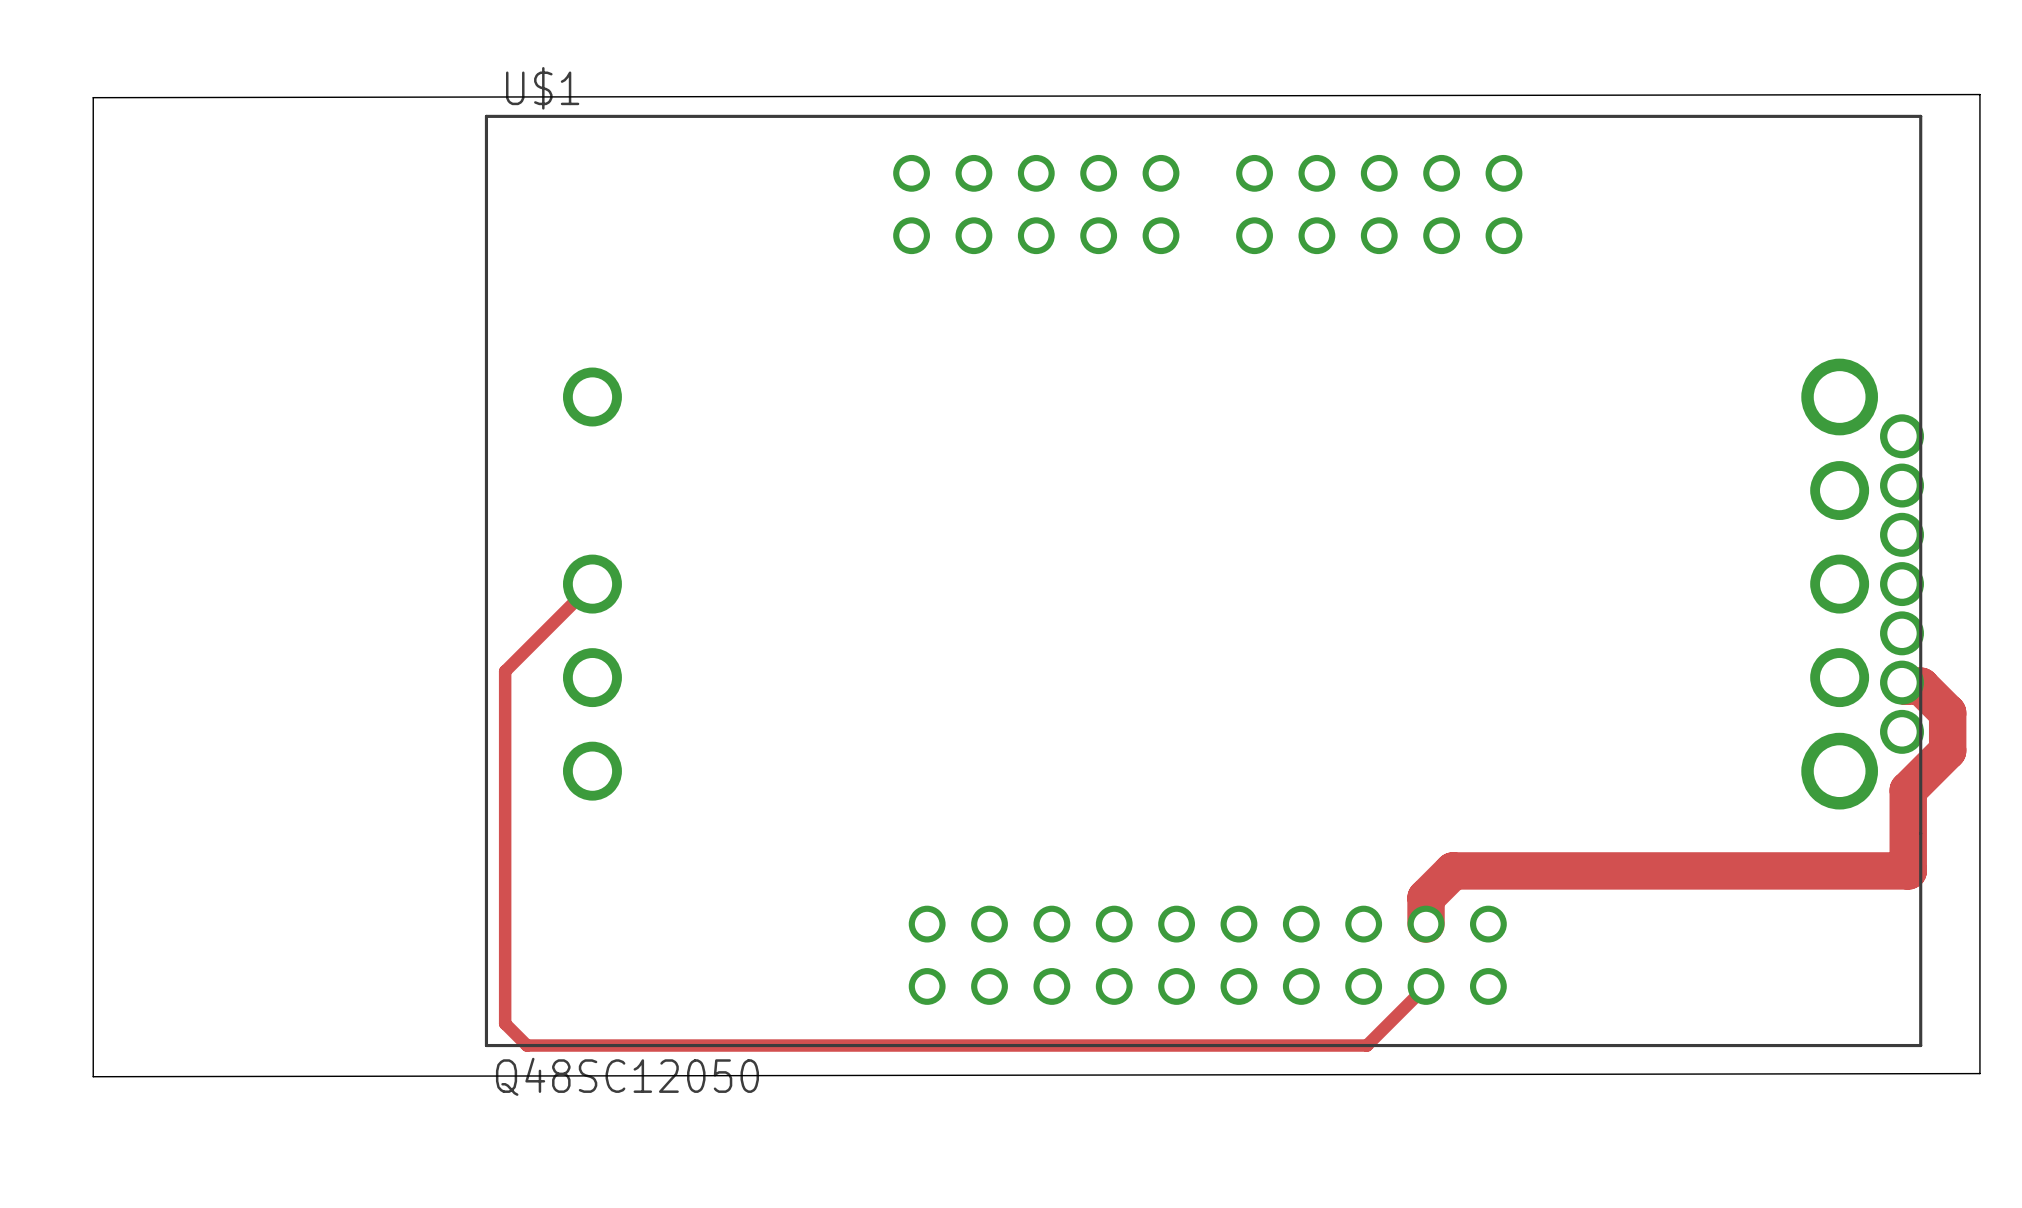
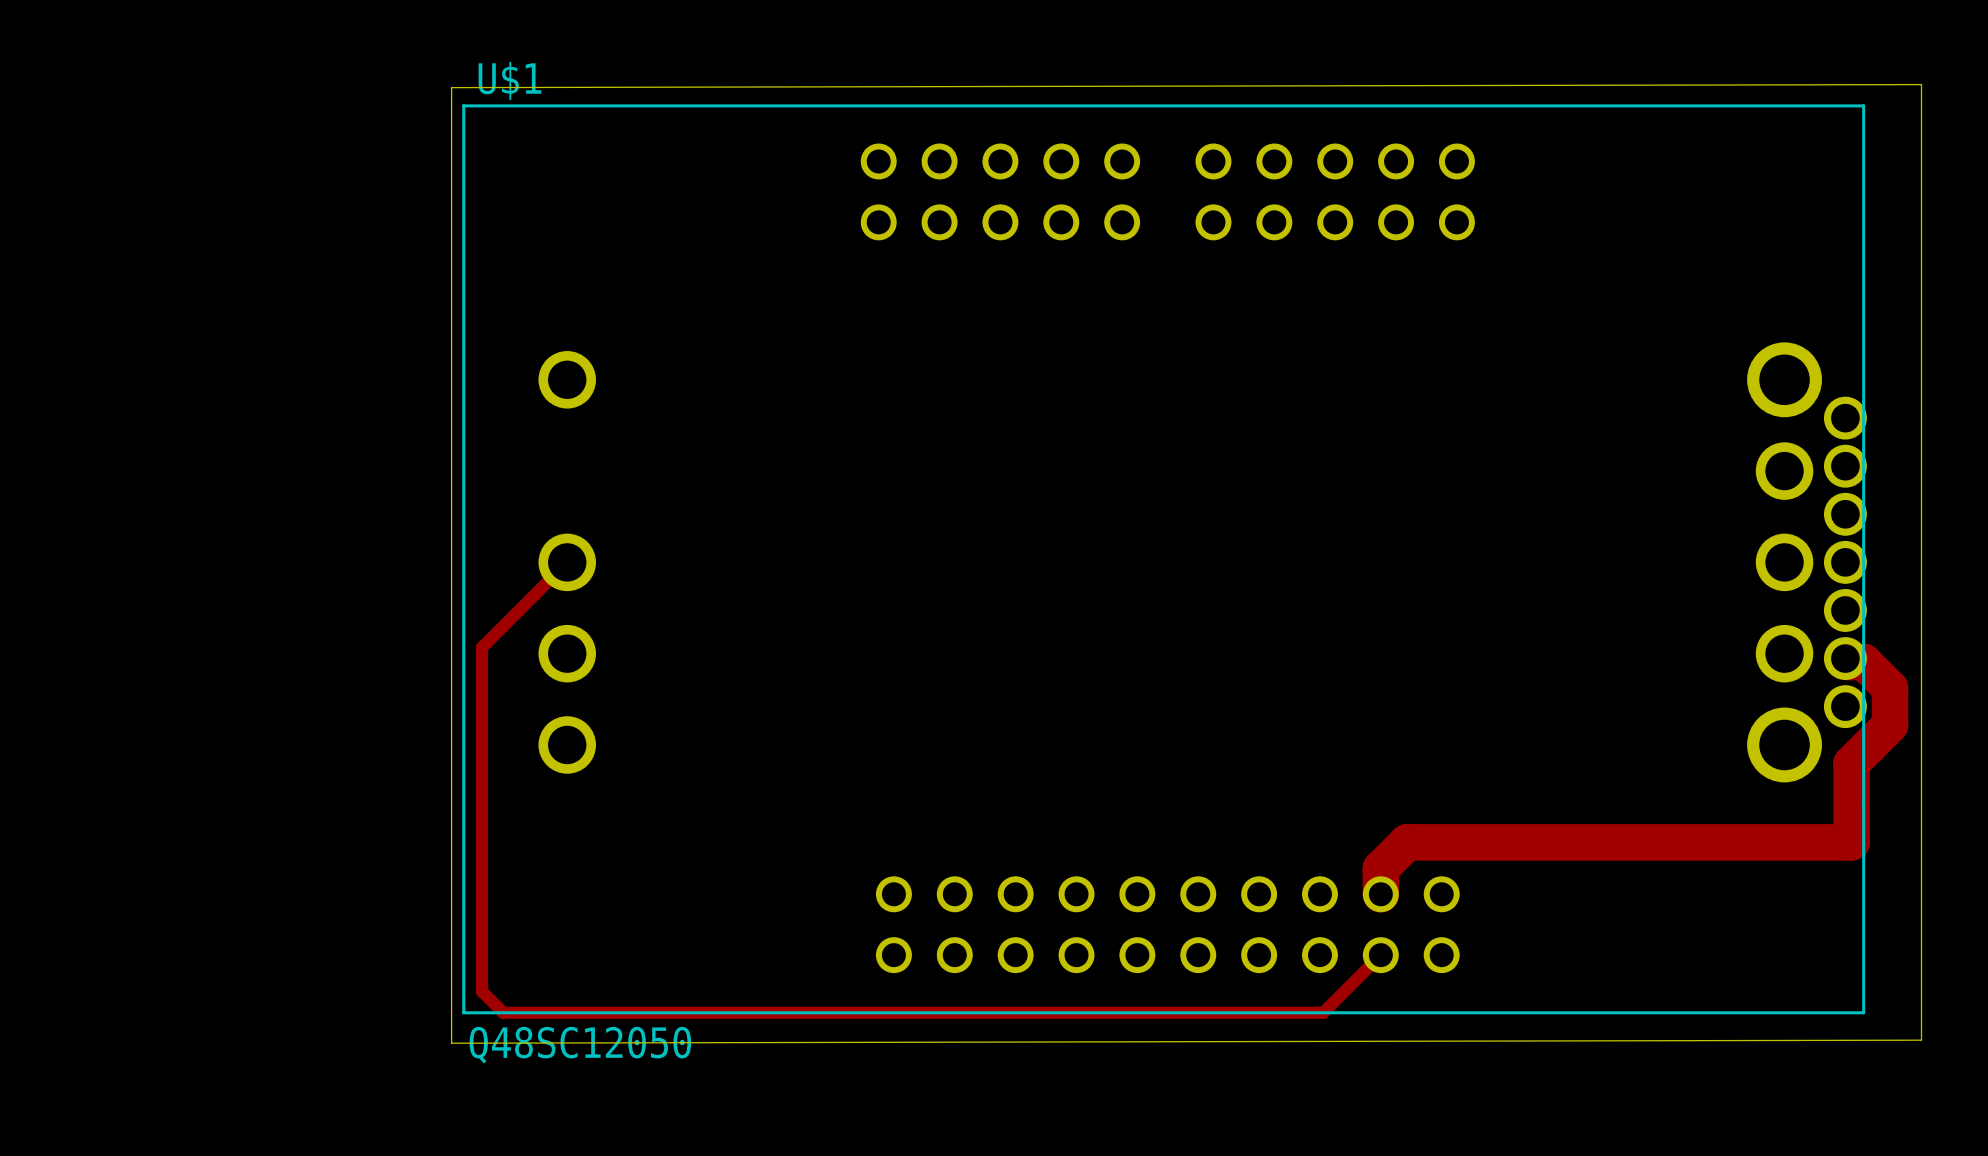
board edge: (1979, 94) (93, 97) (93, 1076) (1979, 1073) -> (1921, 84) (451, 87) (451, 1043) (1921, 1040)

